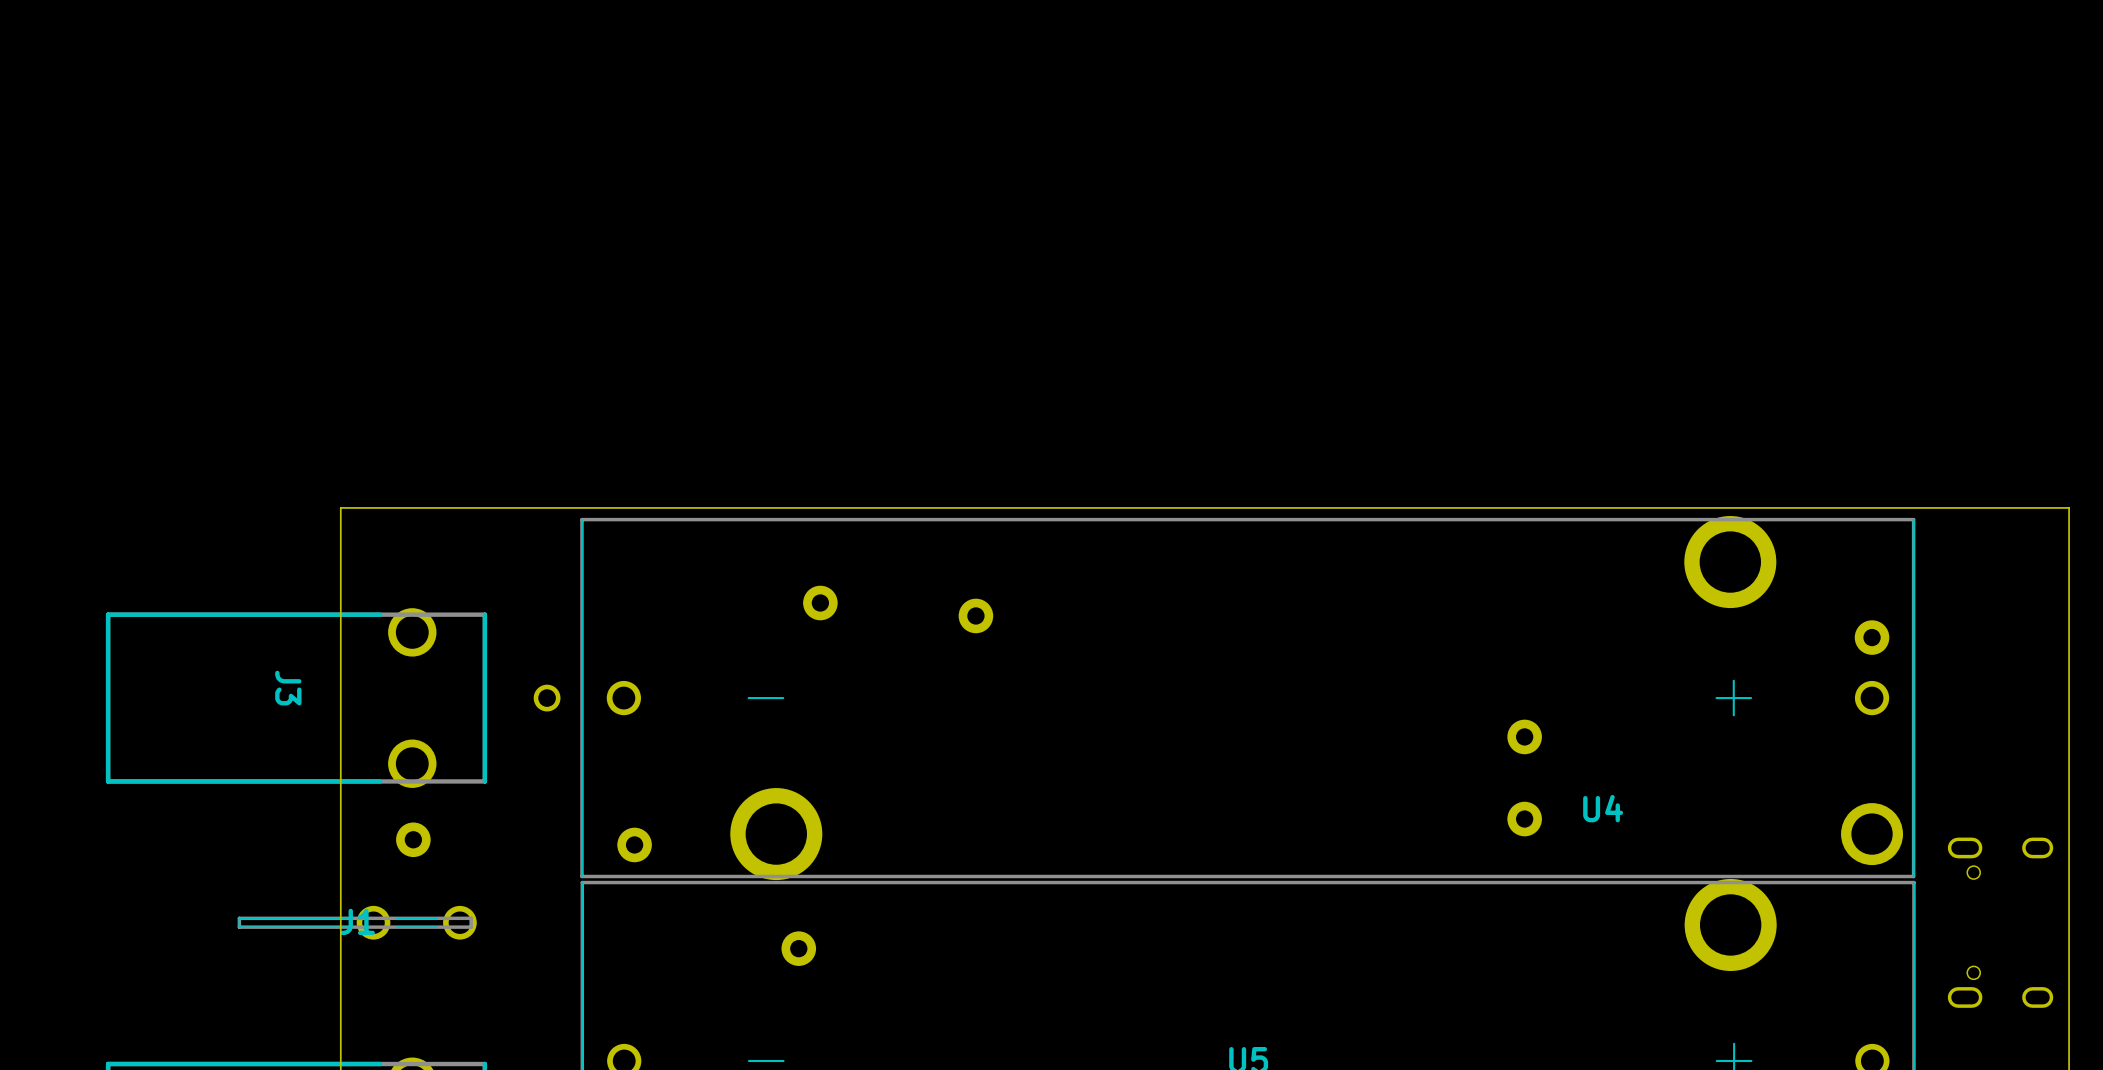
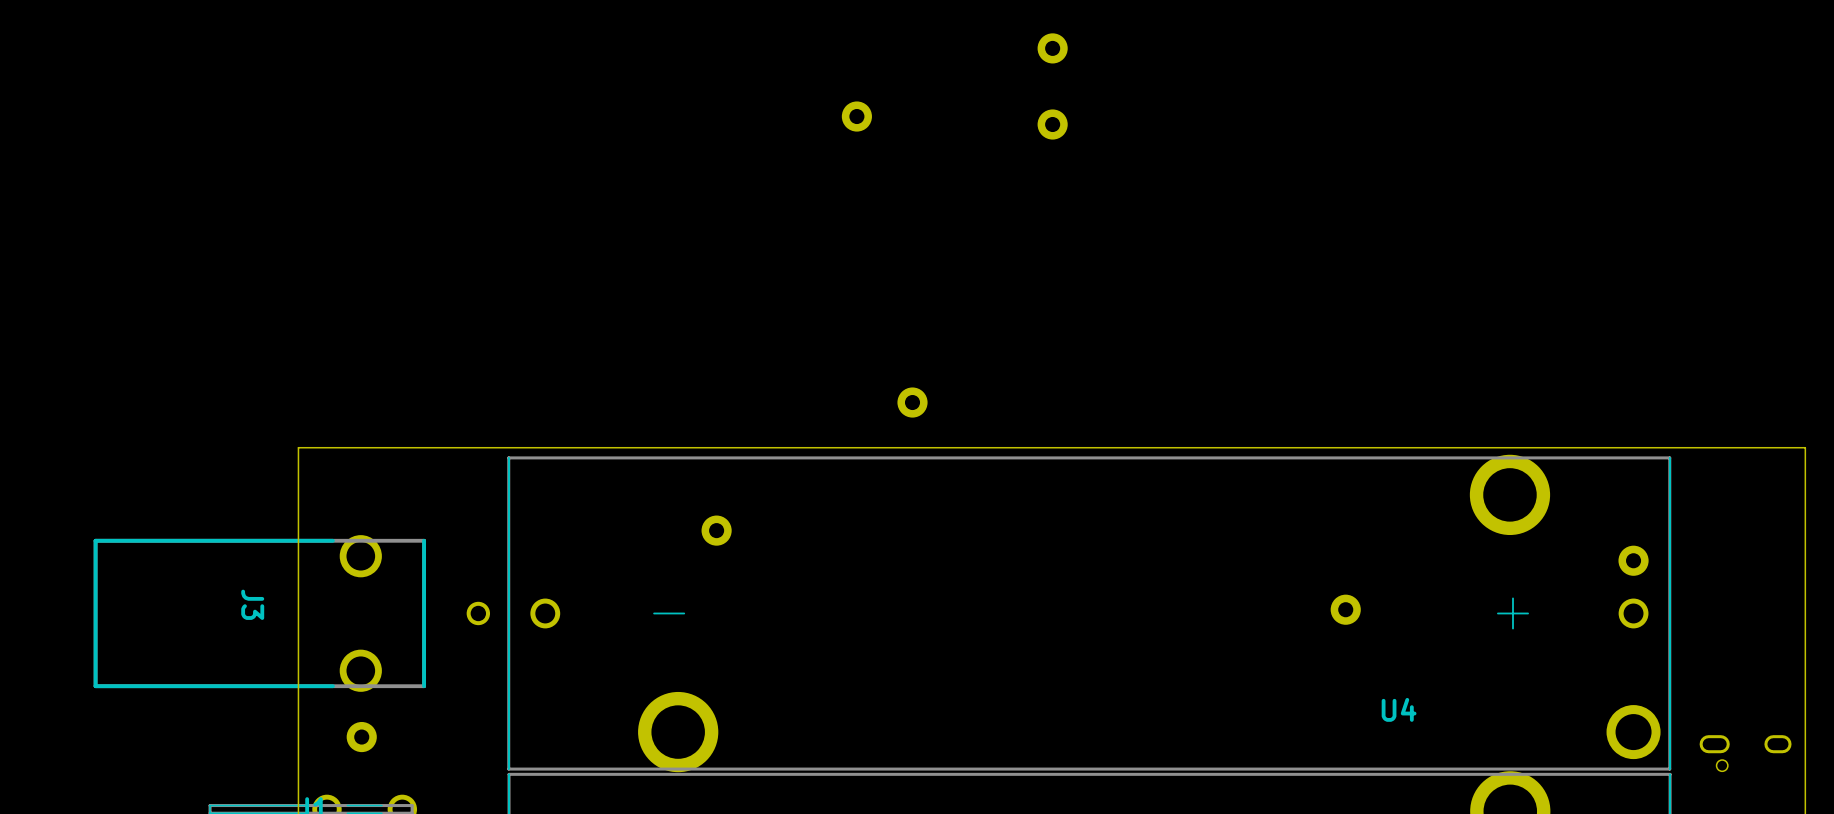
part: none -> (1052, 48)
part: none -> (856, 116)
part: none -> (1052, 124)
part position: (975, 615) -> (912, 402)
part position: (1524, 736) -> (1345, 609)
part: (1524, 819) -> none
part: (634, 844) -> none

